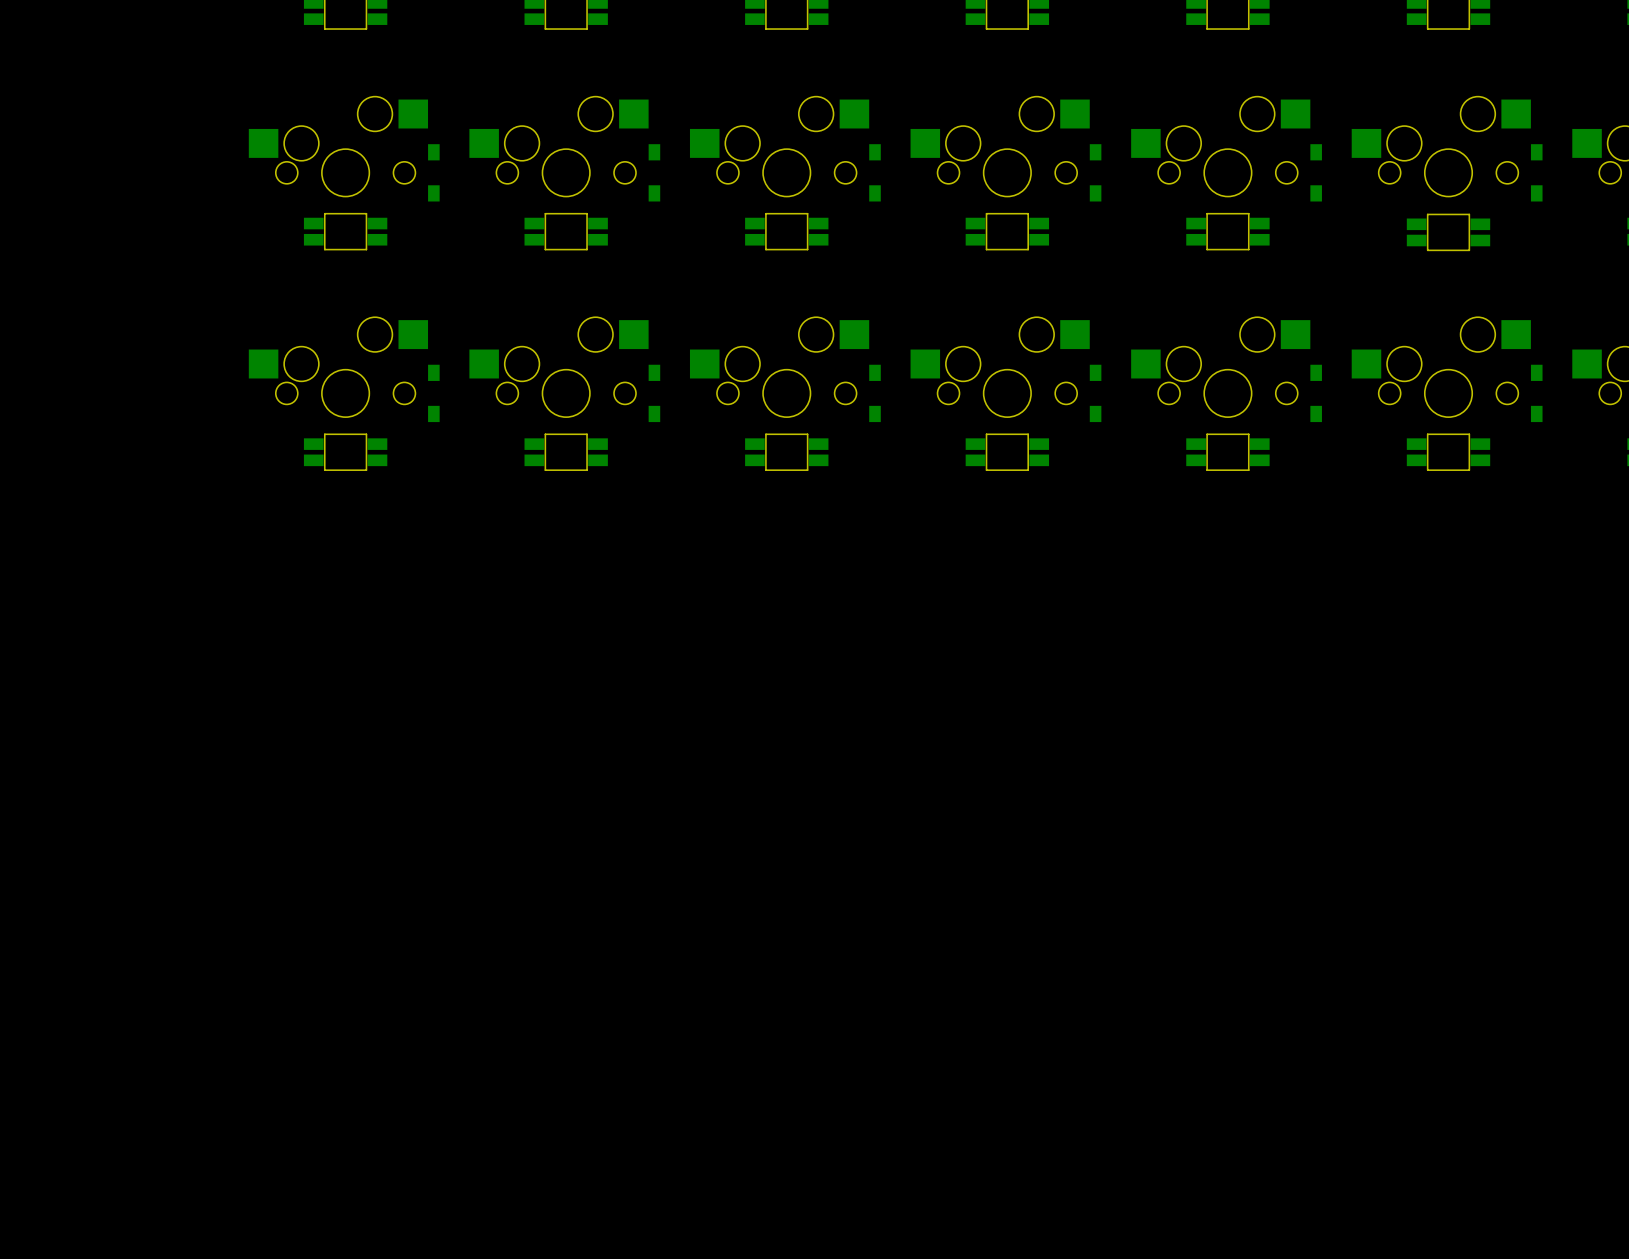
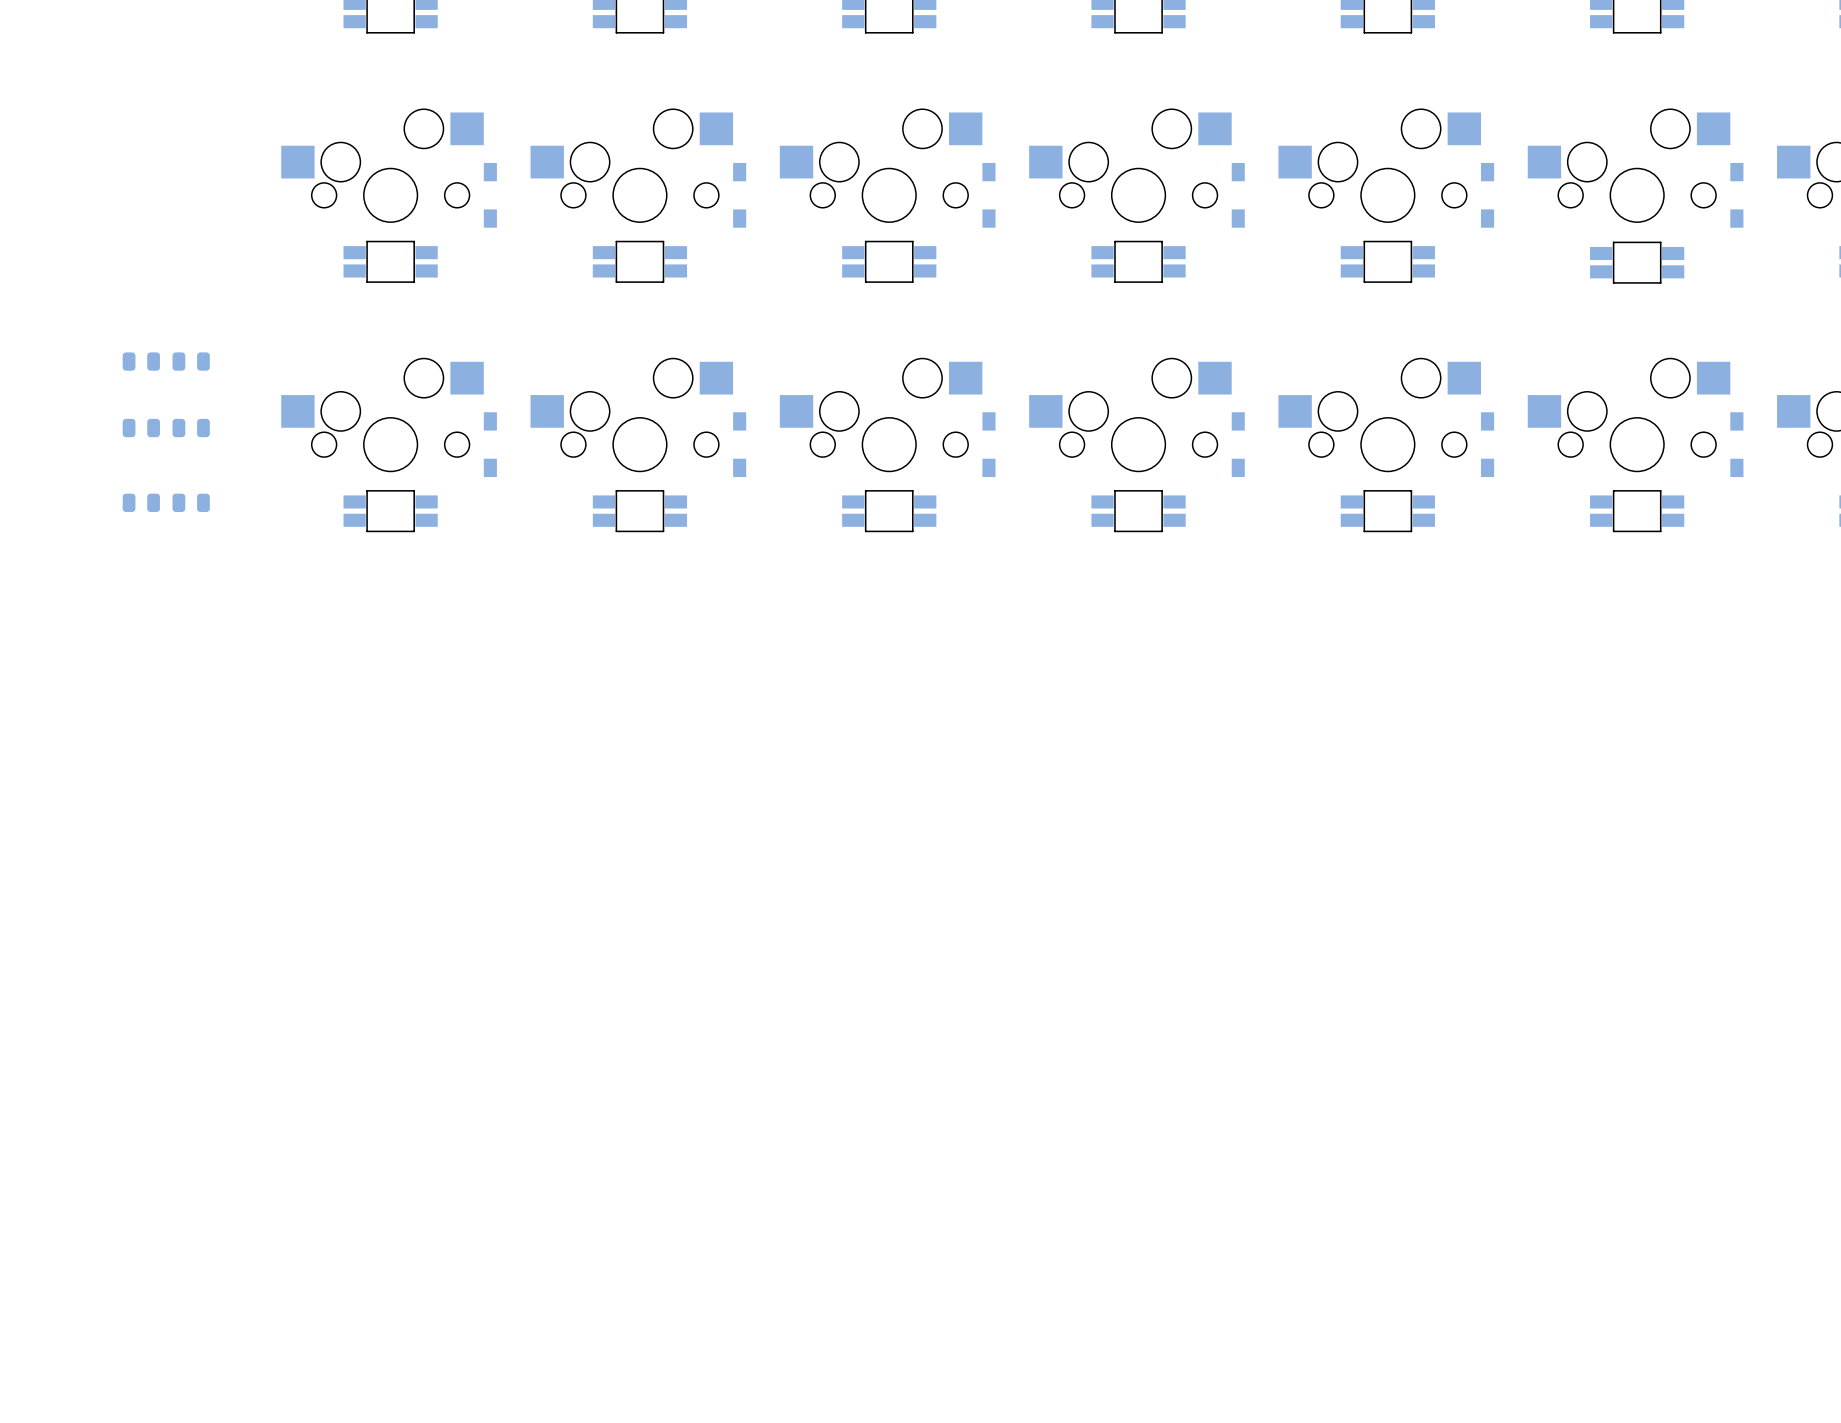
part: none -> (141, 361)
part: none -> (191, 361)
part: none -> (141, 428)
part: none -> (191, 428)
part: none -> (141, 502)
part: none -> (191, 502)

